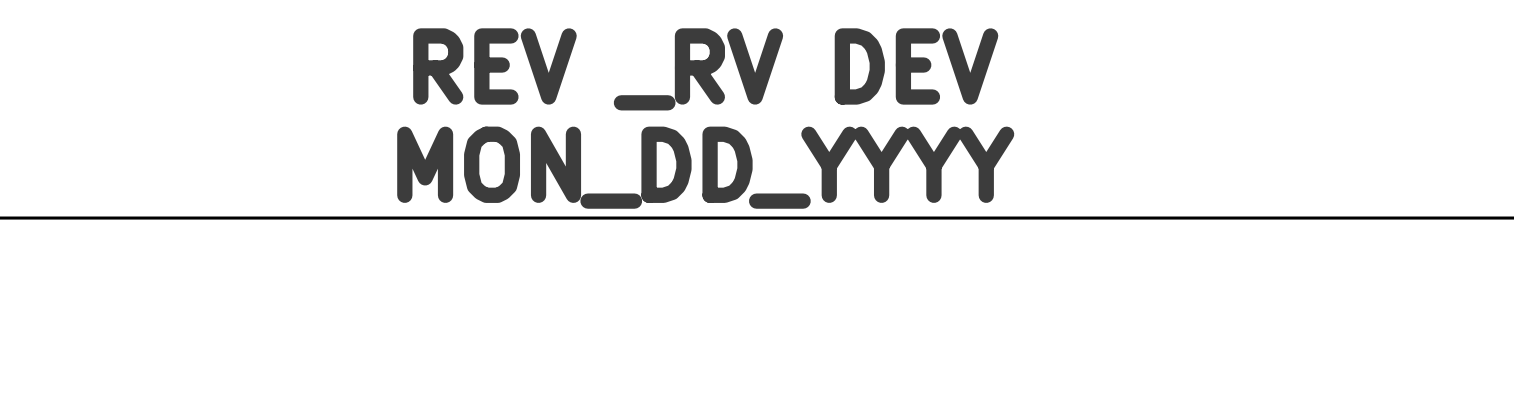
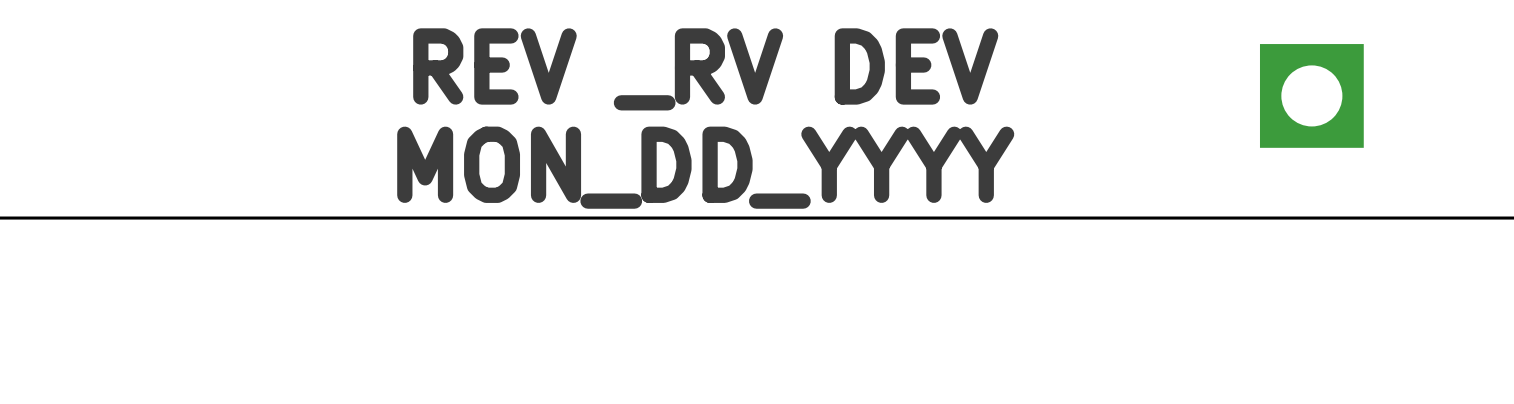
part: none -> (1311, 95)

